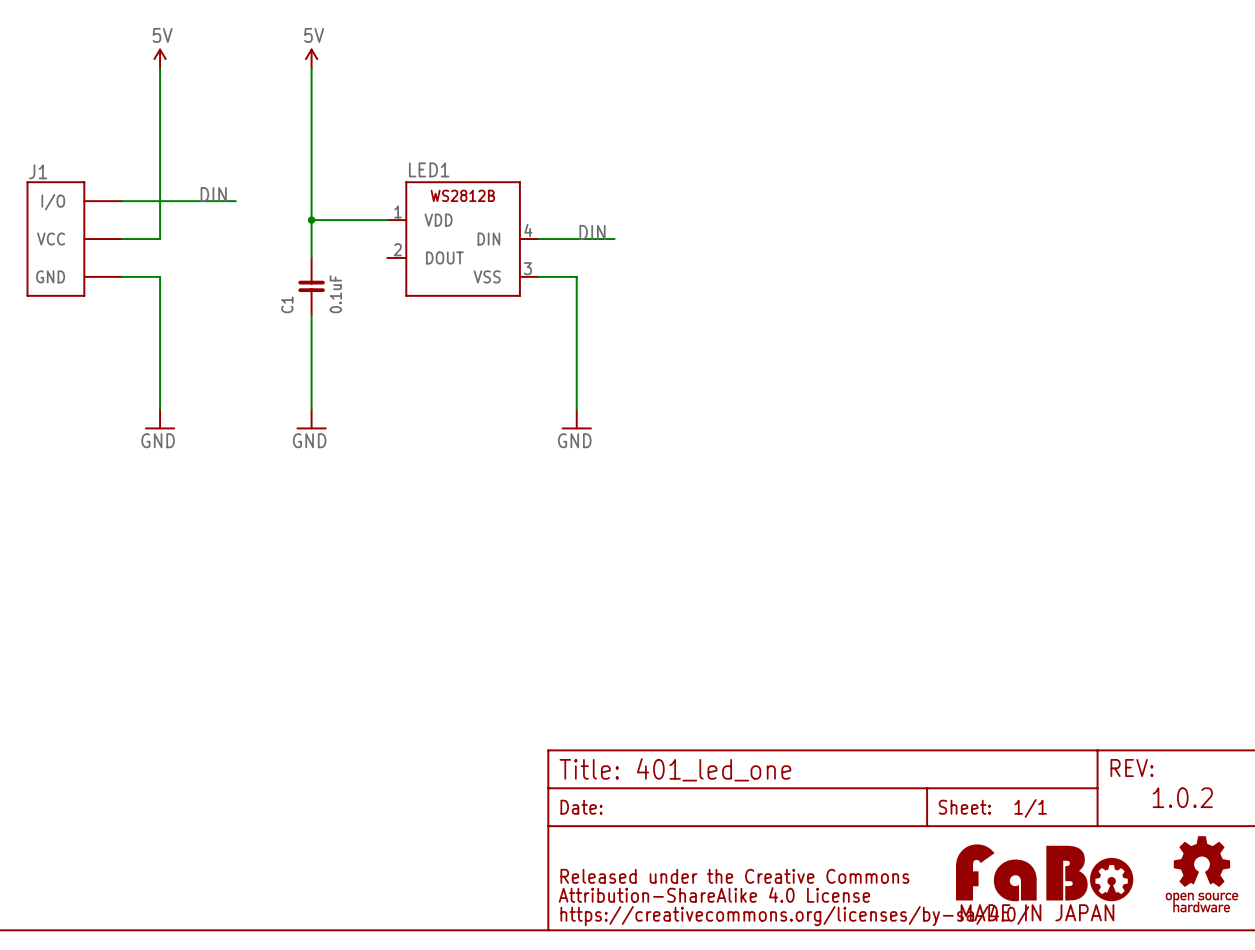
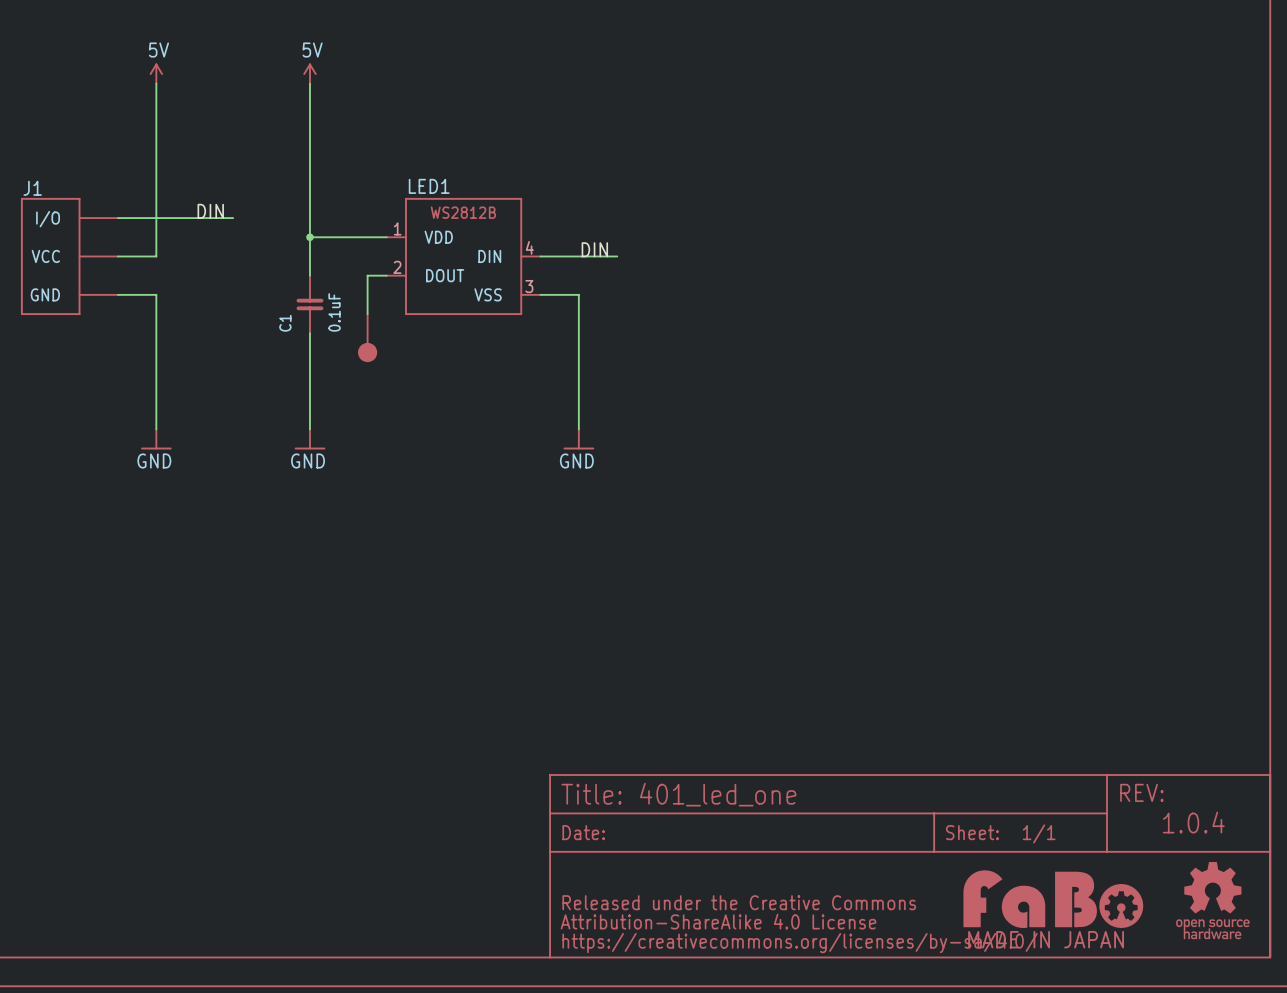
wire: none -> (386, 275) (367, 275) (367, 314)
part: none -> (367, 338)
text: 1.0.2 (1182, 797) -> 1.0.4 (1193, 822)

